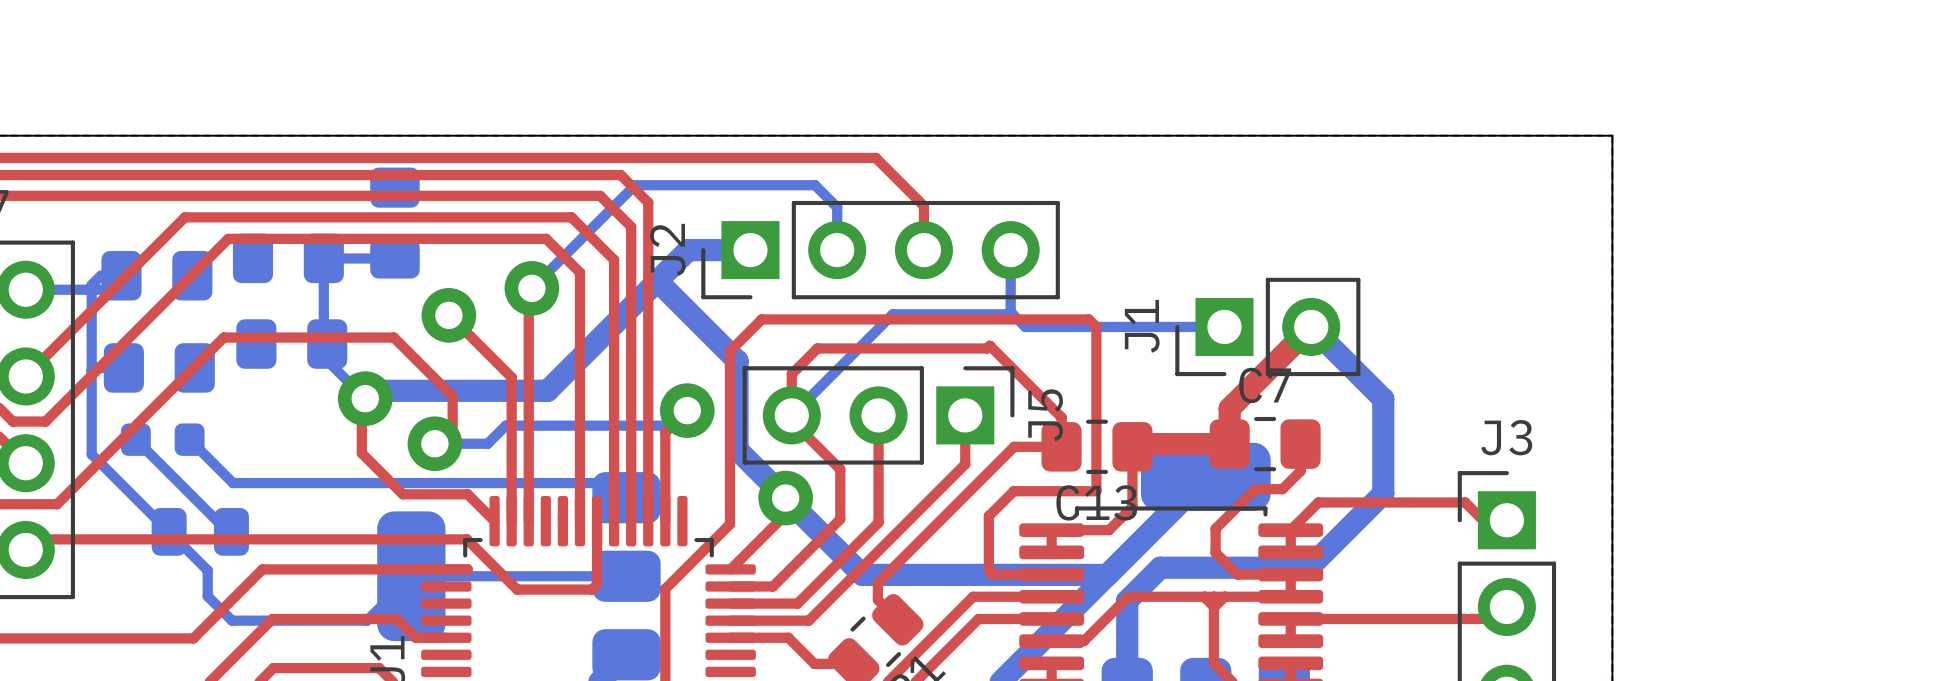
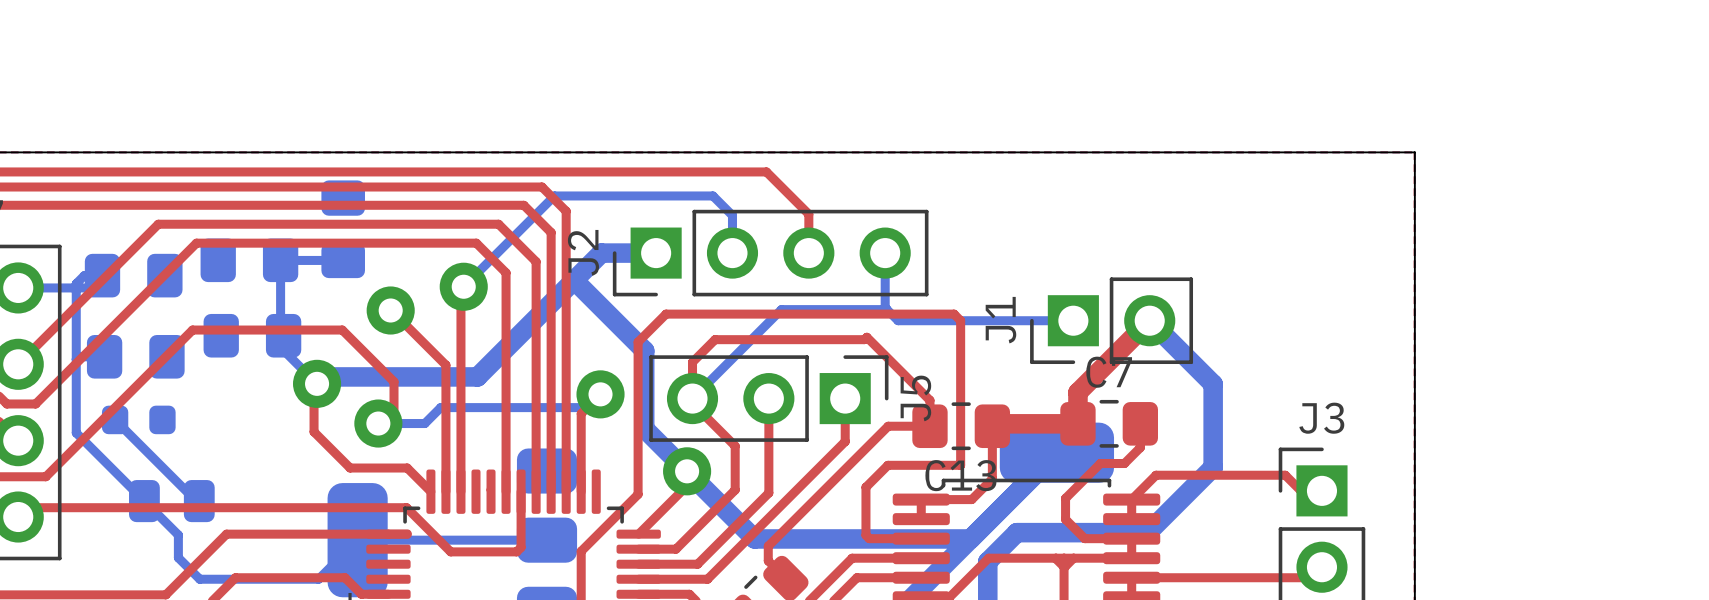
bottom track: (189, 439) (233, 483) (611, 483) (626, 497) -> none

